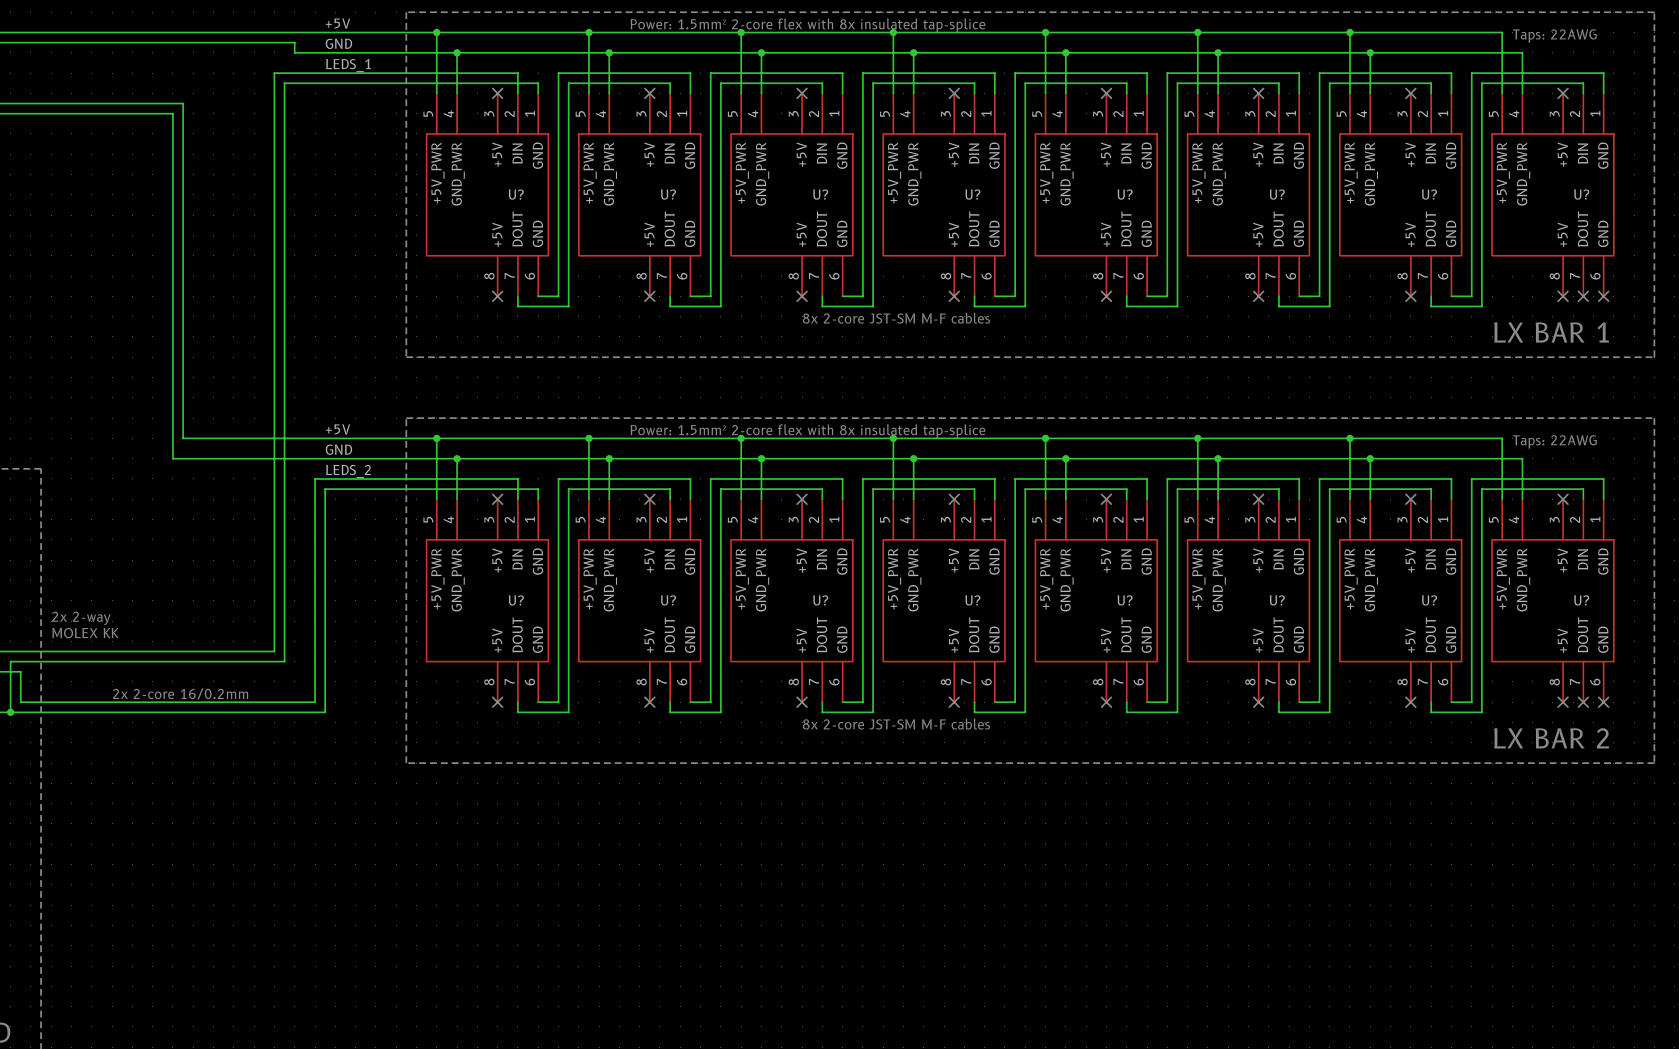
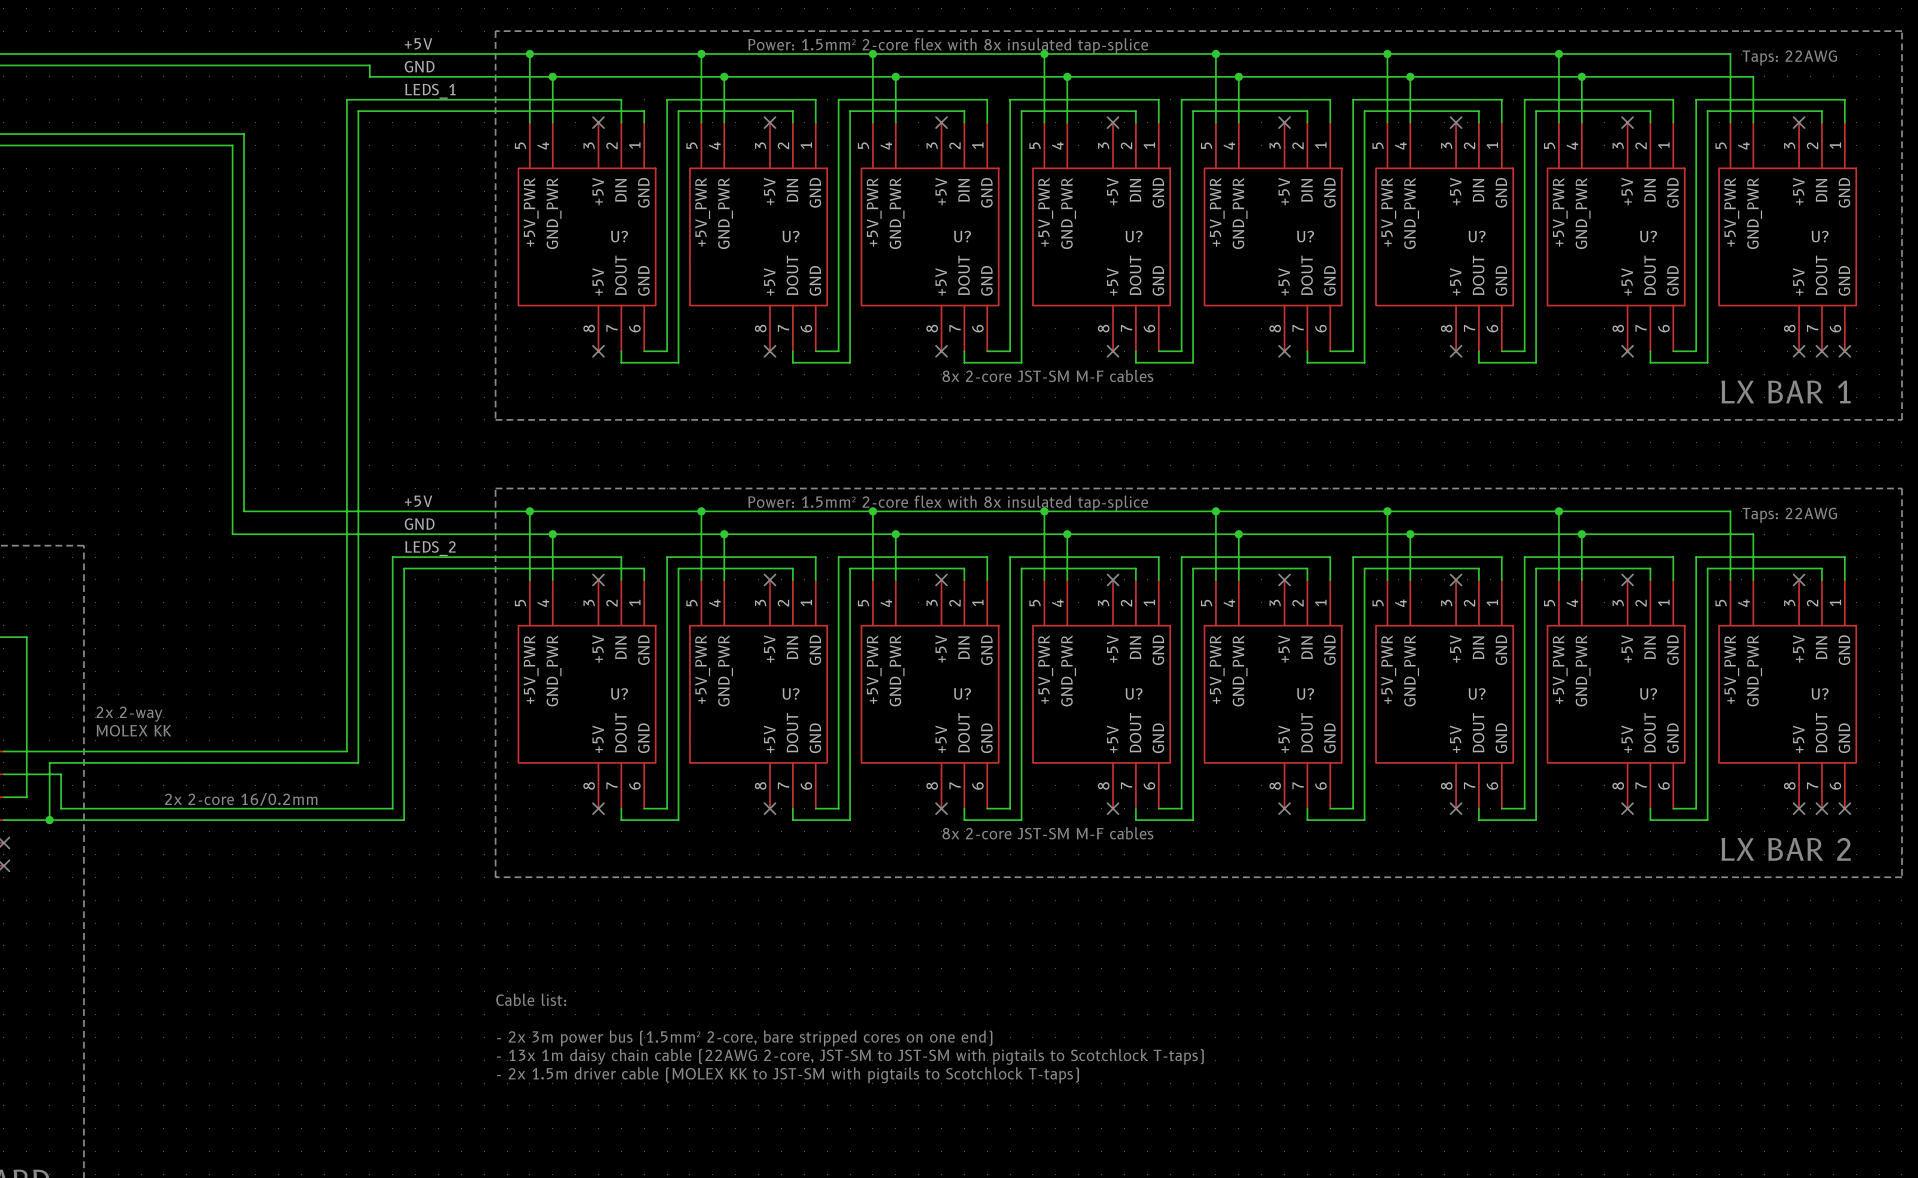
text: none -> Cable list: (531, 999)
text: none -> - 2x 3m power bus (1.5mm² 2-core, bare stripped cores on one end) (744, 1038)
text: none -> - 13x 1m daisy chain cable (22AWG 2-core, JST-SM to JST-SM with pigtails to Scotchlock T-taps) (850, 1056)
text: none -> - 2x 1.5m driver cable (MOLEX KK to JST-SM with pigtails to Scotchlock T-taps) (788, 1075)

